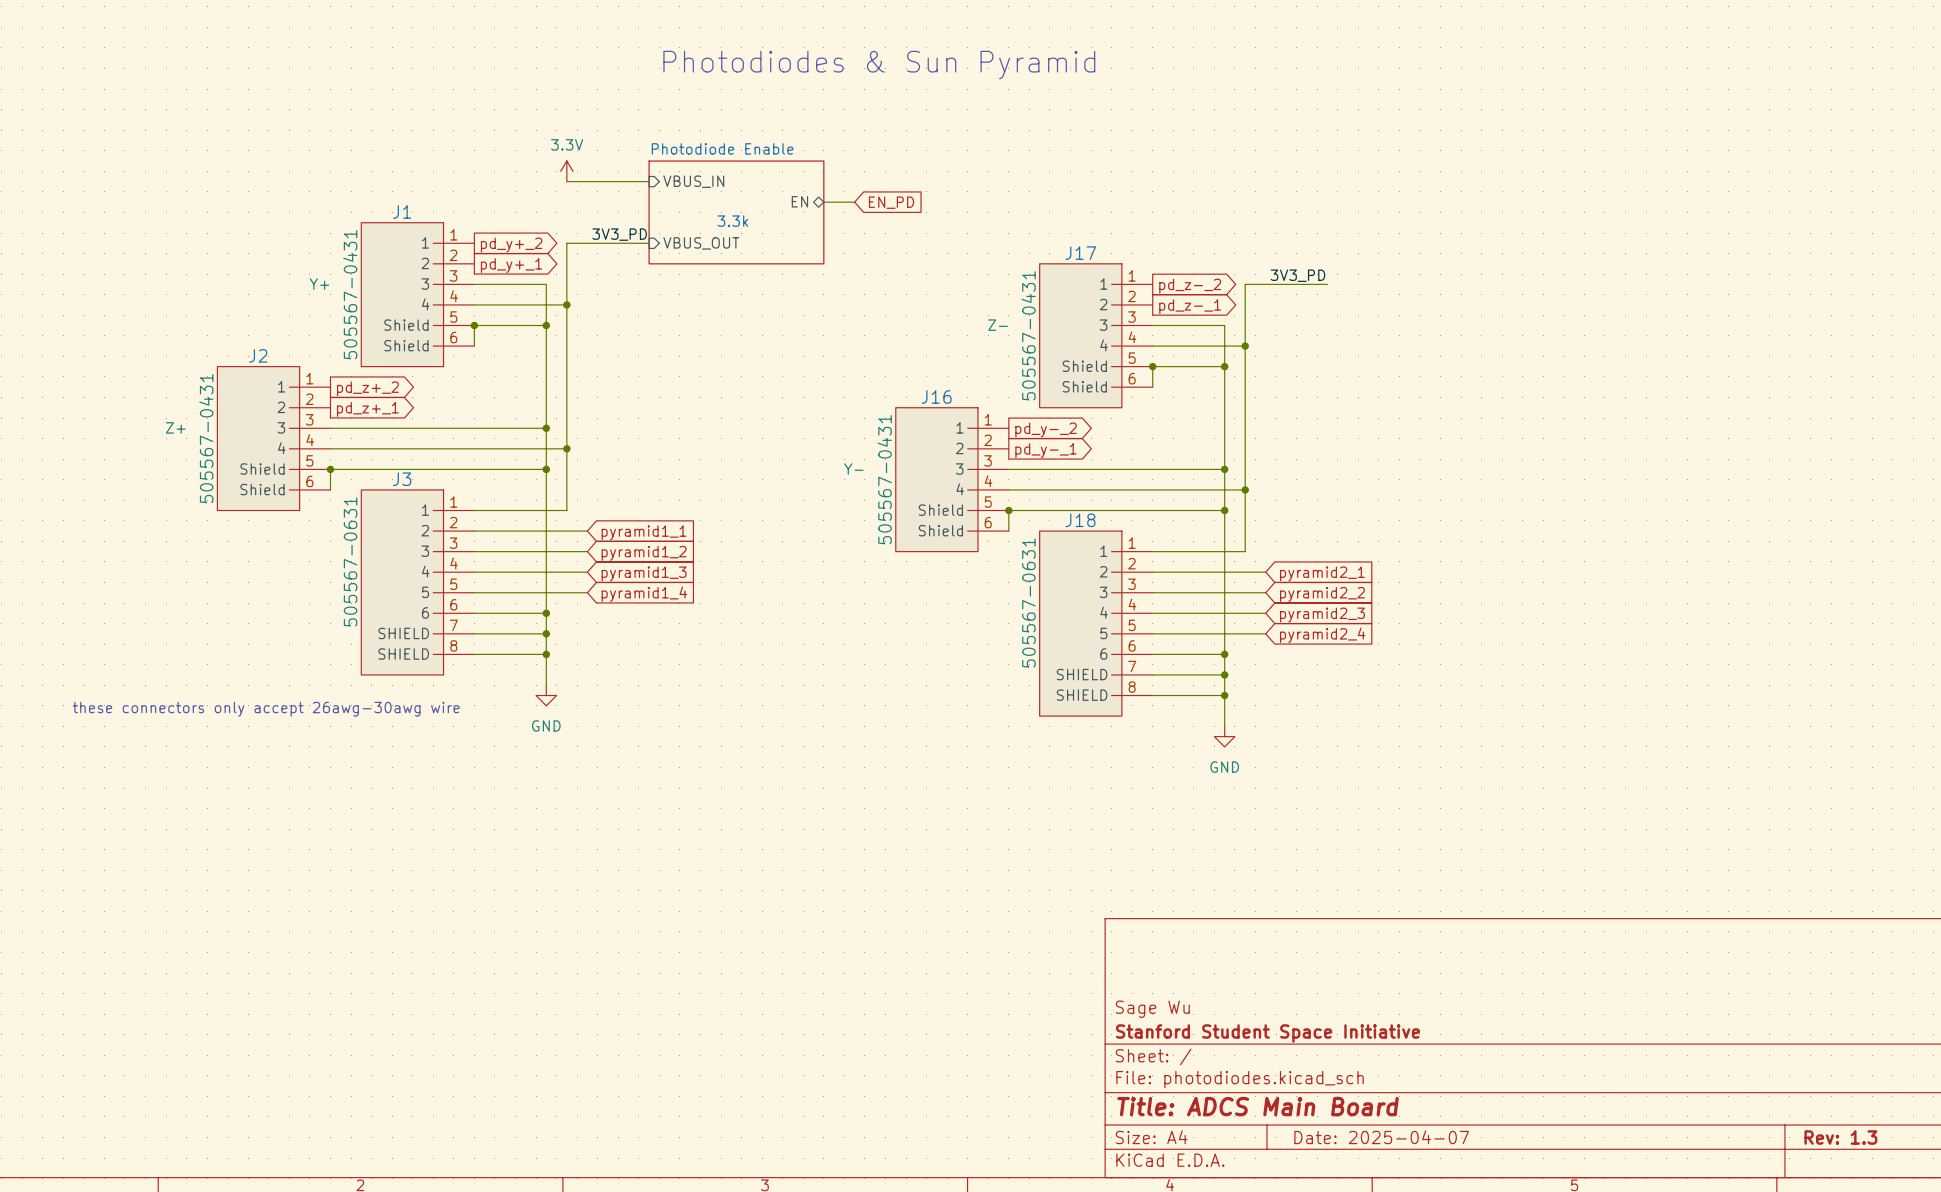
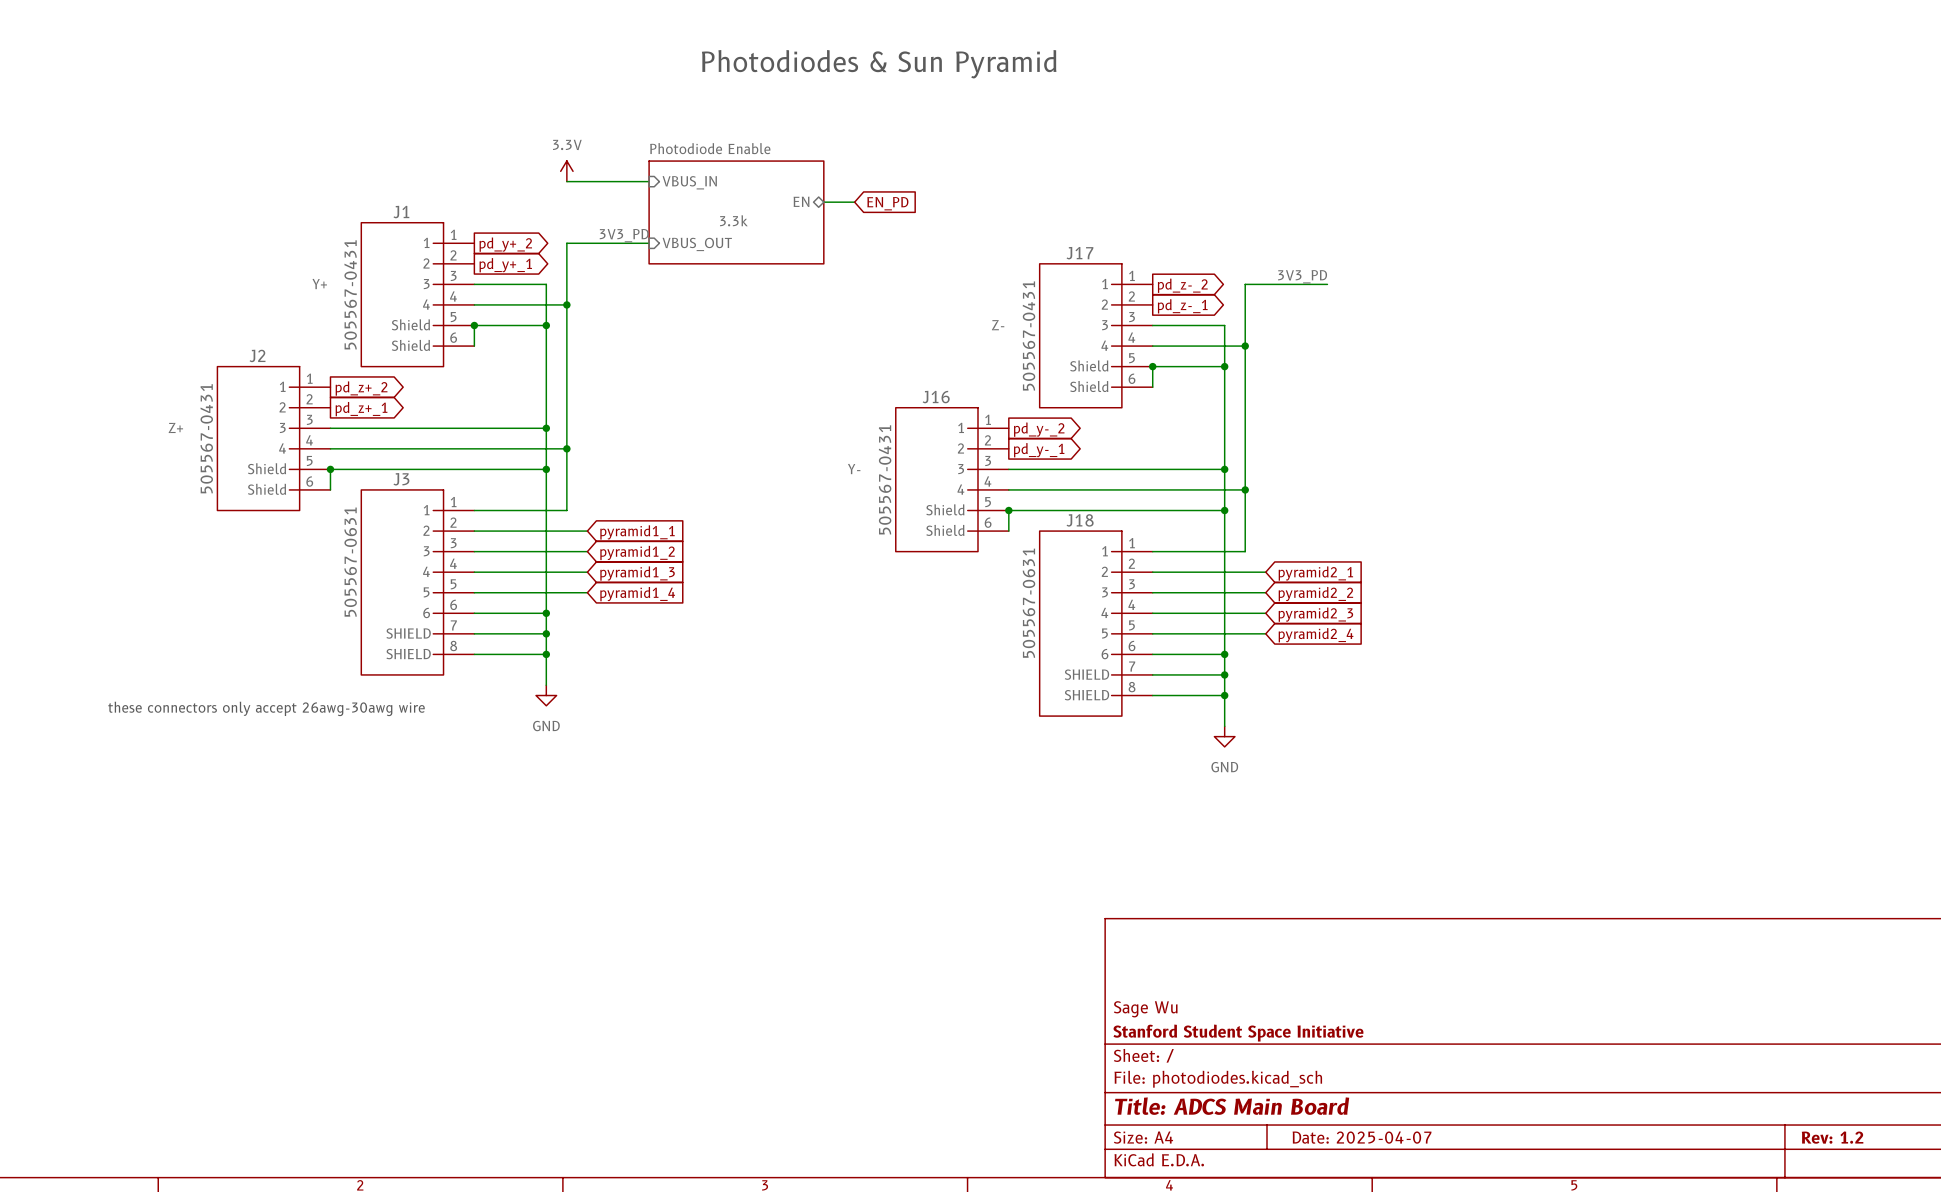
title block: Rev: 1.3 (1840, 1137) -> Rev: 1.2 (1832, 1137)

